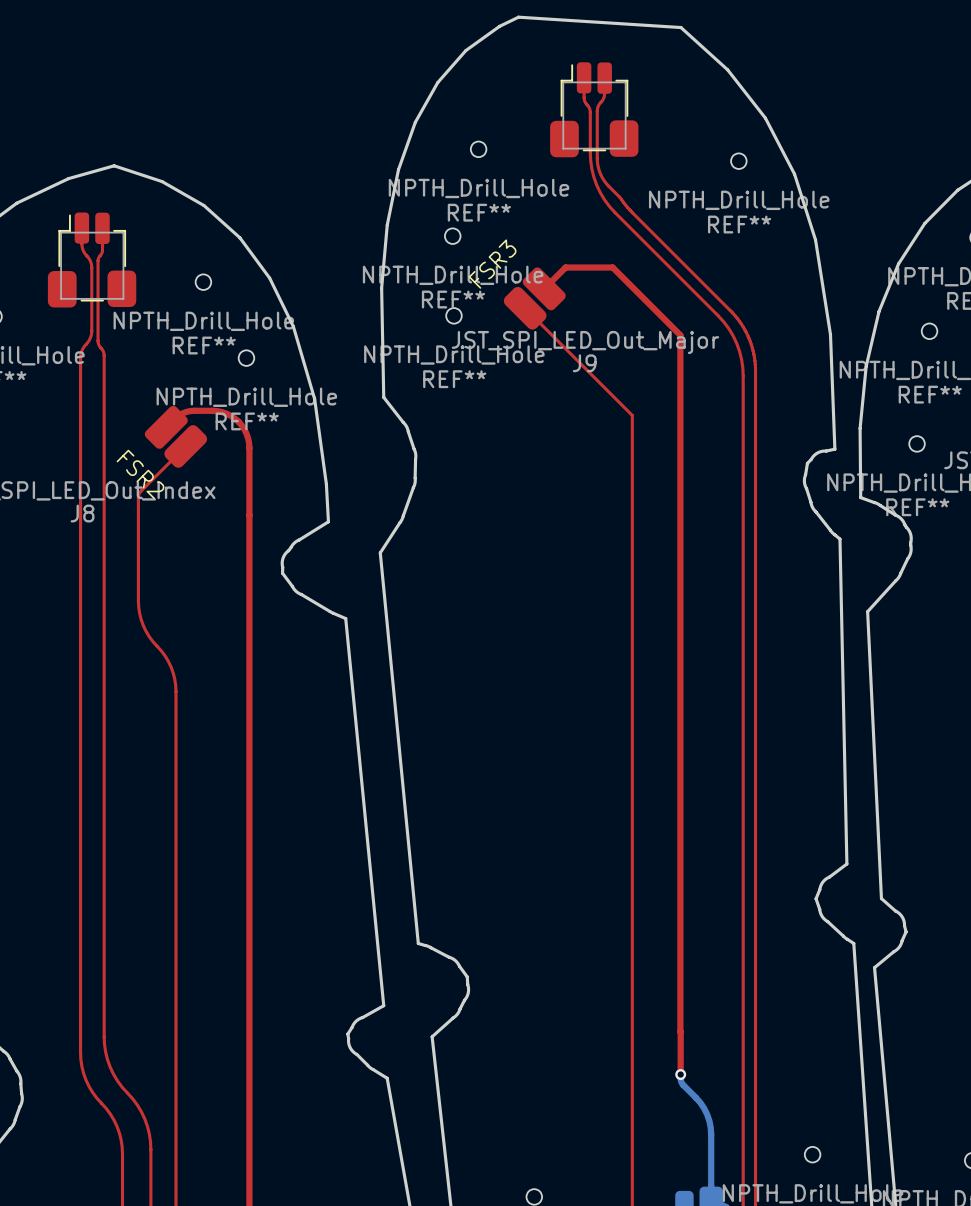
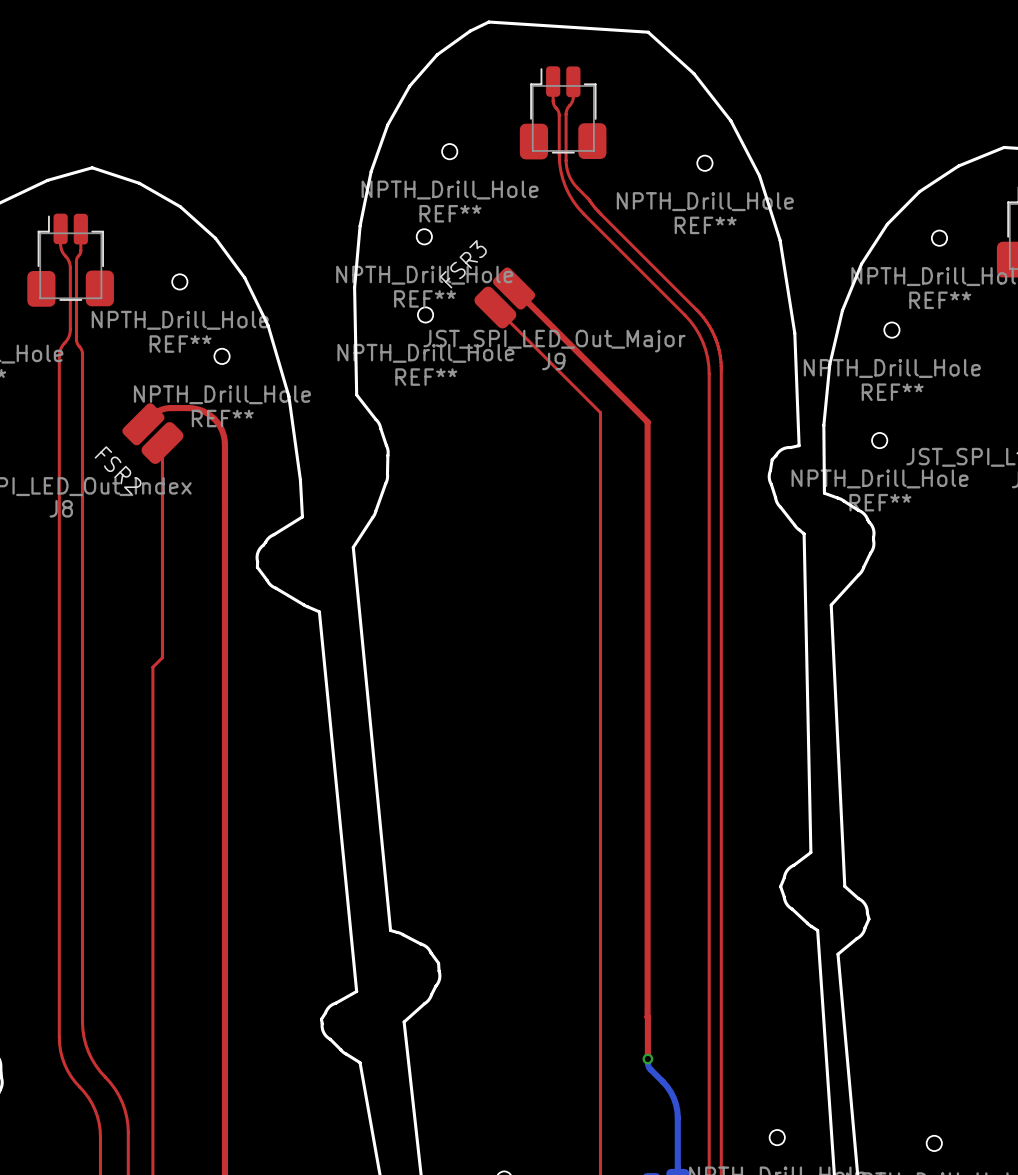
top track: (544, 288) (565, 267) (612, 267) (680, 335) (680, 425) -> (514, 288) (647, 422)
top track: (185, 446) (141, 490) (138, 497) (139, 613) (145, 631) (171, 667) (175, 691) -> (162, 443) (162, 657) (152, 667) (152, 683)

